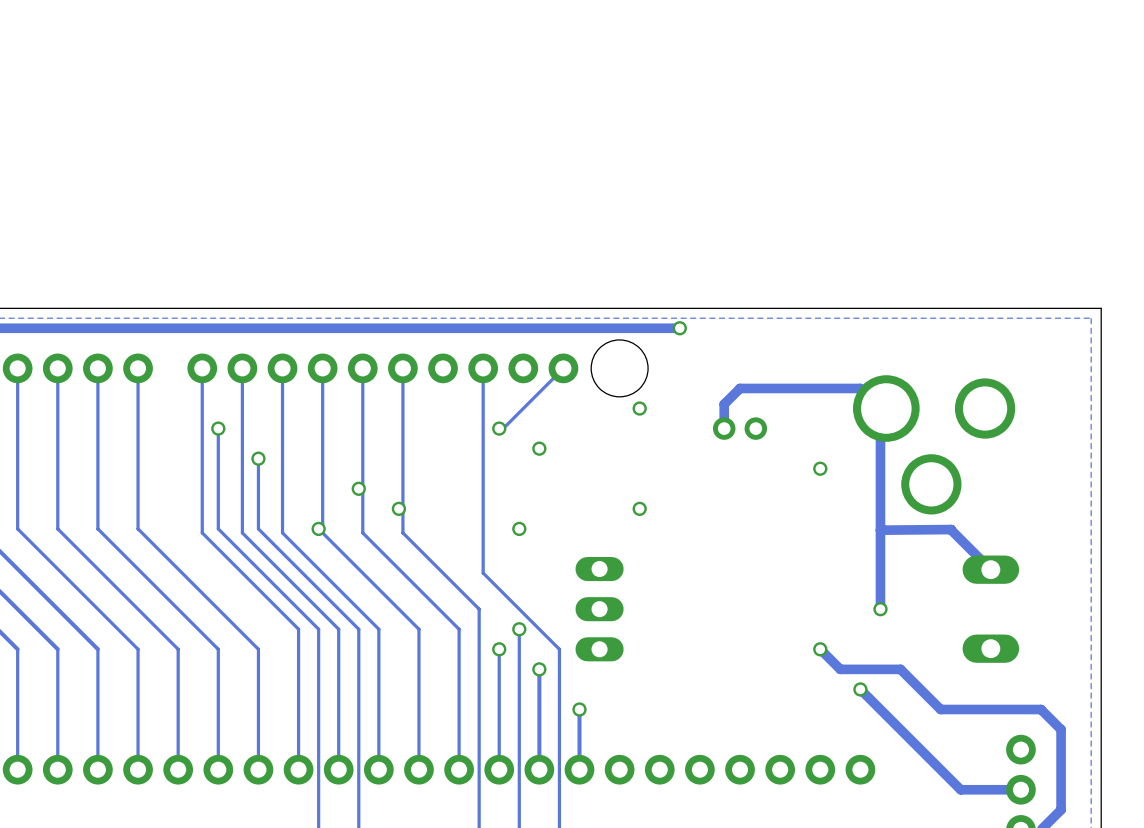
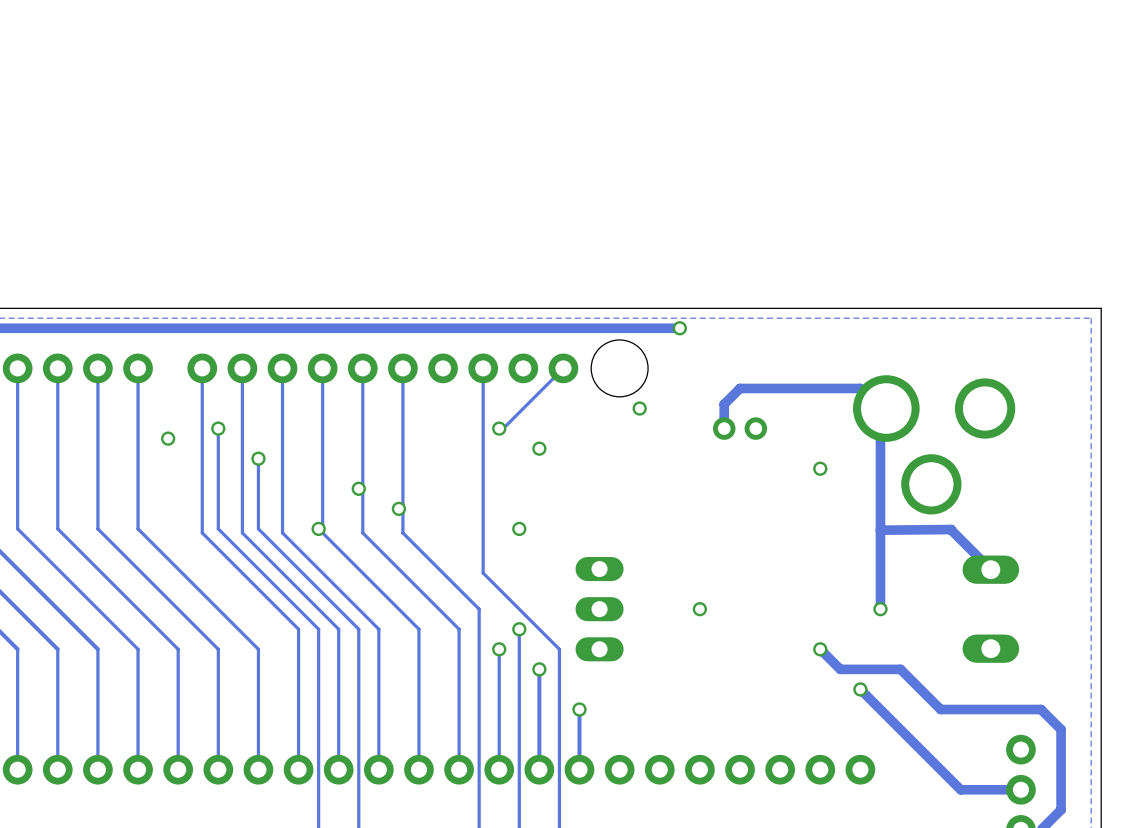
via: none -> (168, 438)
via: (639, 508) -> none
via: none -> (699, 609)

